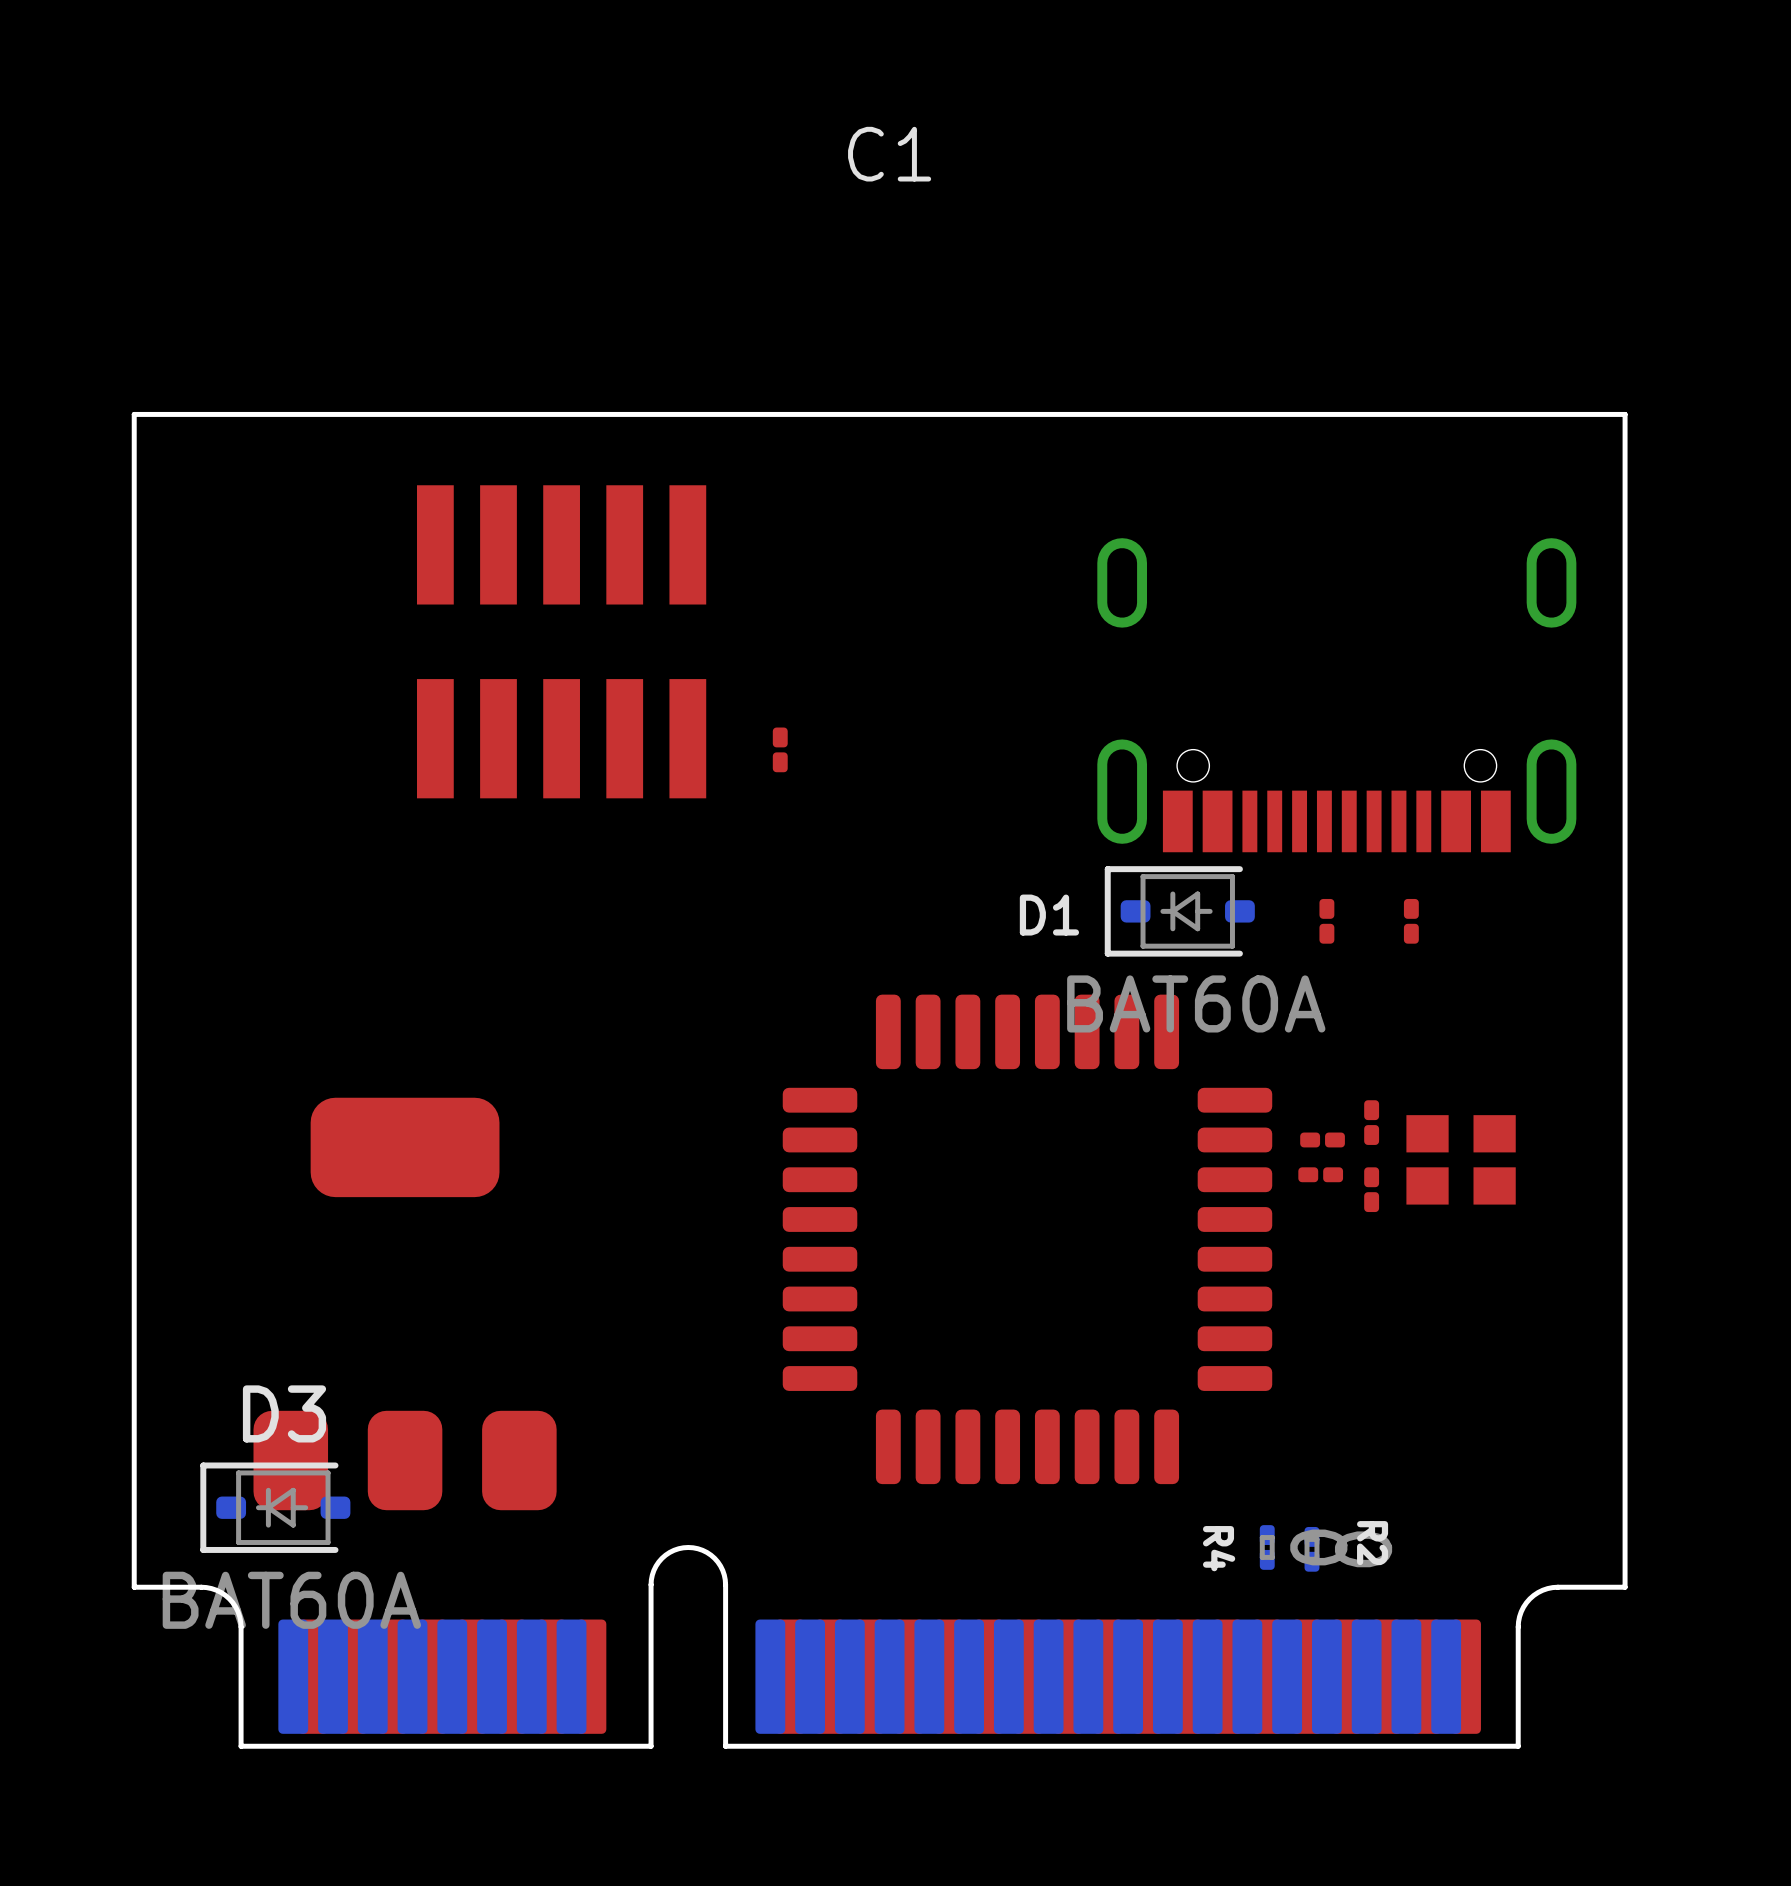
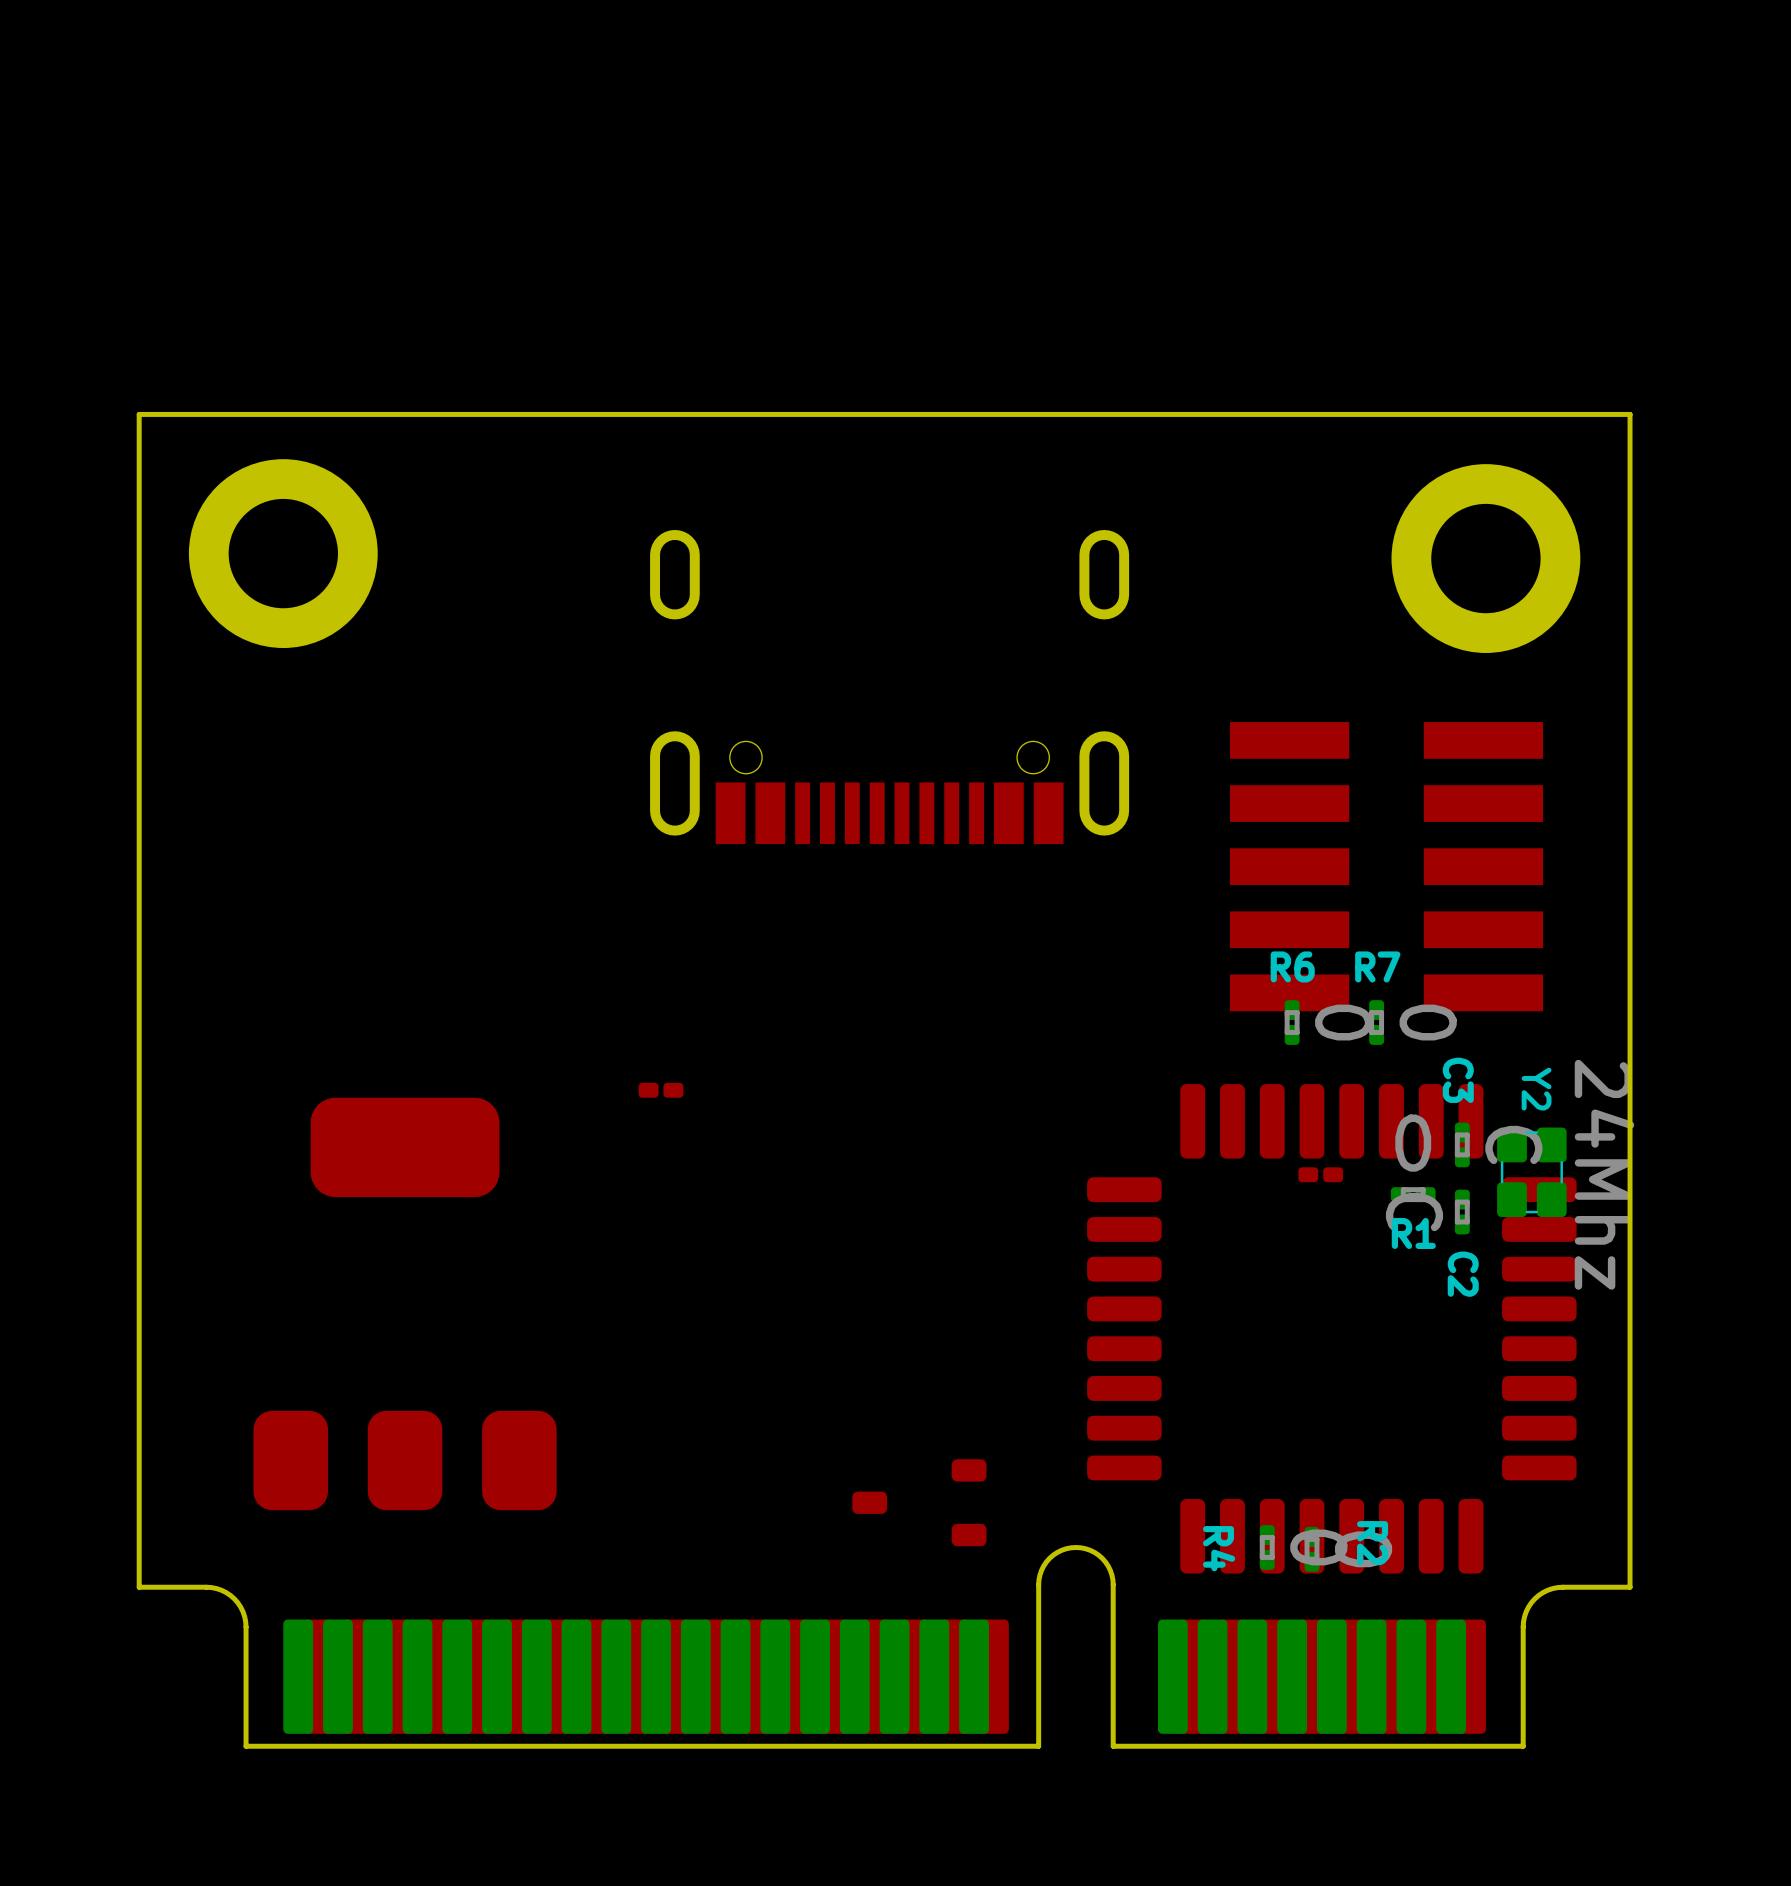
part: none -> (283, 553)
part: none -> (1485, 558)
part rotation: 0° (561, 641) -> 90° clockwise (1386, 866)
part position: (561, 641) -> (1386, 866)
part position: (1336, 695) -> (889, 687)
part rotation: 0° (780, 749) -> 90° clockwise (660, 1090)
part position: (780, 749) -> (660, 1090)
D1: BAT60A (1179, 911) -> none
R6 side: top (1326, 921) -> bottom (1292, 1022)
R7 side: top (1411, 921) -> bottom (1376, 1022)
C1 side: bottom (879, 1080) -> top (884, 1080)
C2 side: top (1371, 1122) -> bottom (1462, 1212)
R1 side: top (1322, 1139) -> bottom (1413, 1194)
part: (1461, 1159) -> none
Y2: none -> 24Mhz (1531, 1172)
C3 side: top (1371, 1189) -> bottom (1462, 1144)
part position: (1027, 1239) -> (1331, 1328)
part: none -> (919, 1502)
D3: BAT60A (275, 1507) -> none

